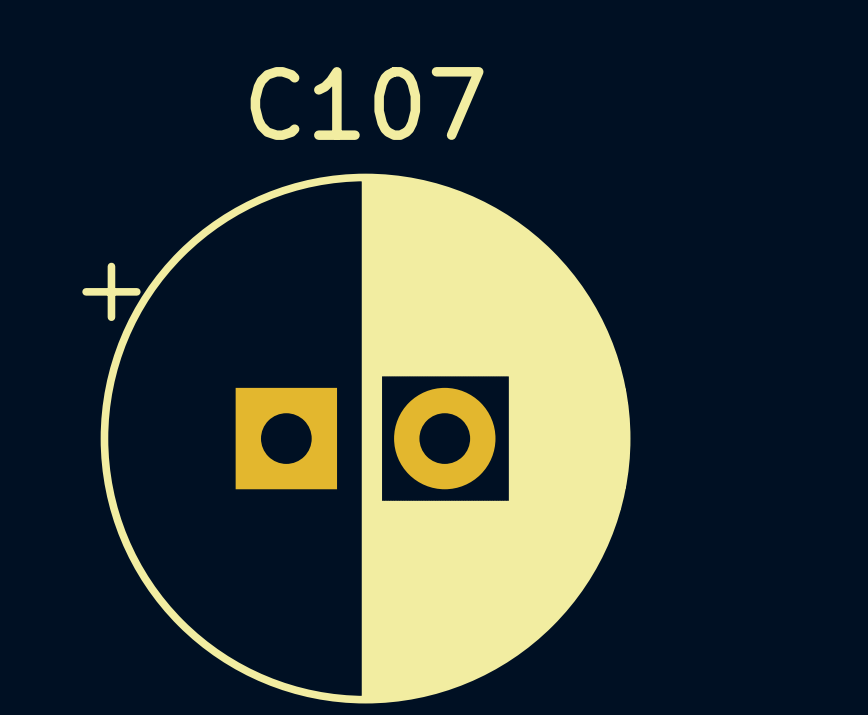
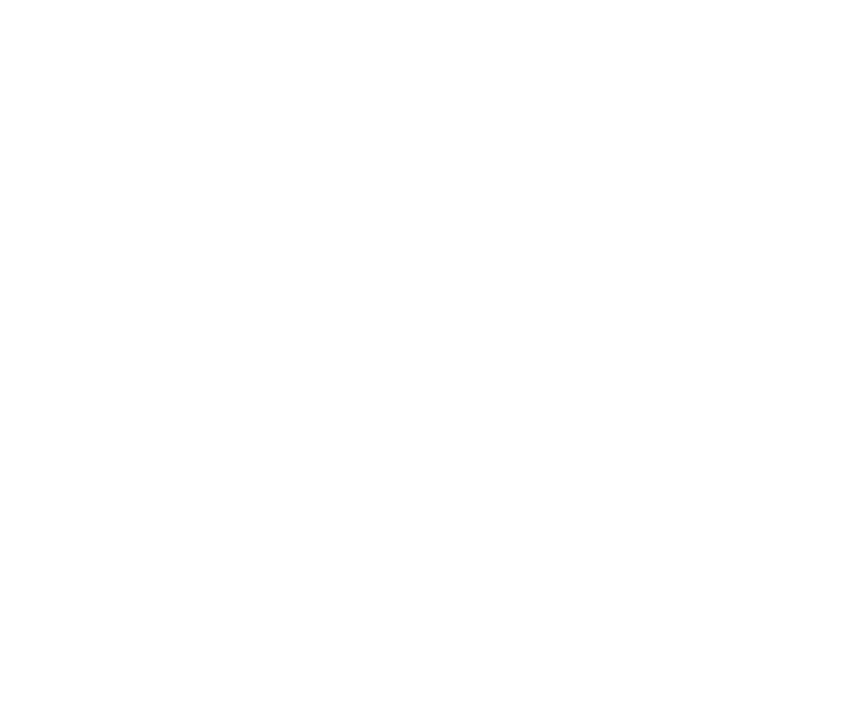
C107: (356, 438) -> none

